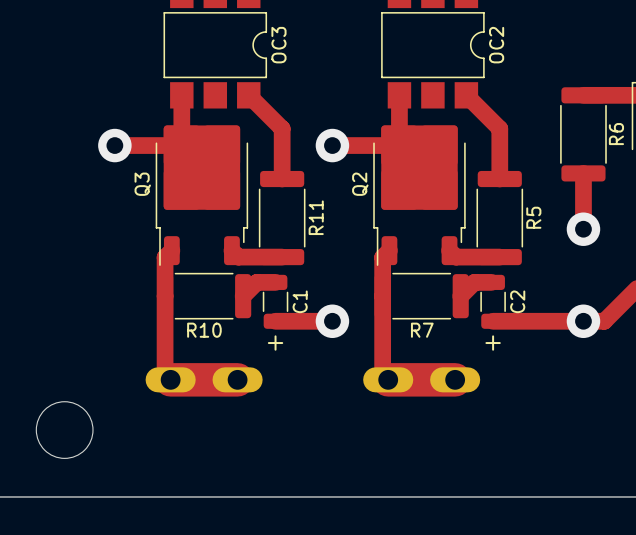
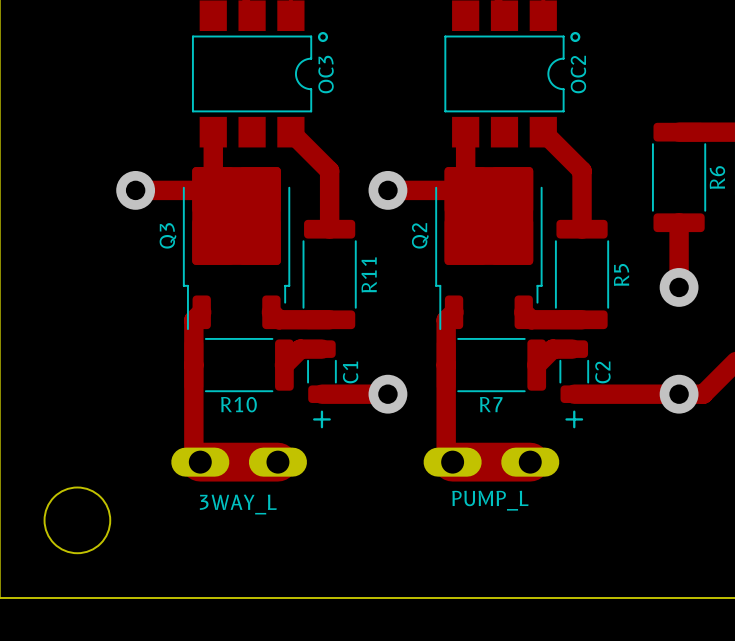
drawing: none -> [317, 31, 329, 43]
drawing: none -> [570, 31, 581, 43]
text: none -> PUMP_L (490, 500)
text: none -> 3WAY_L (238, 504)

